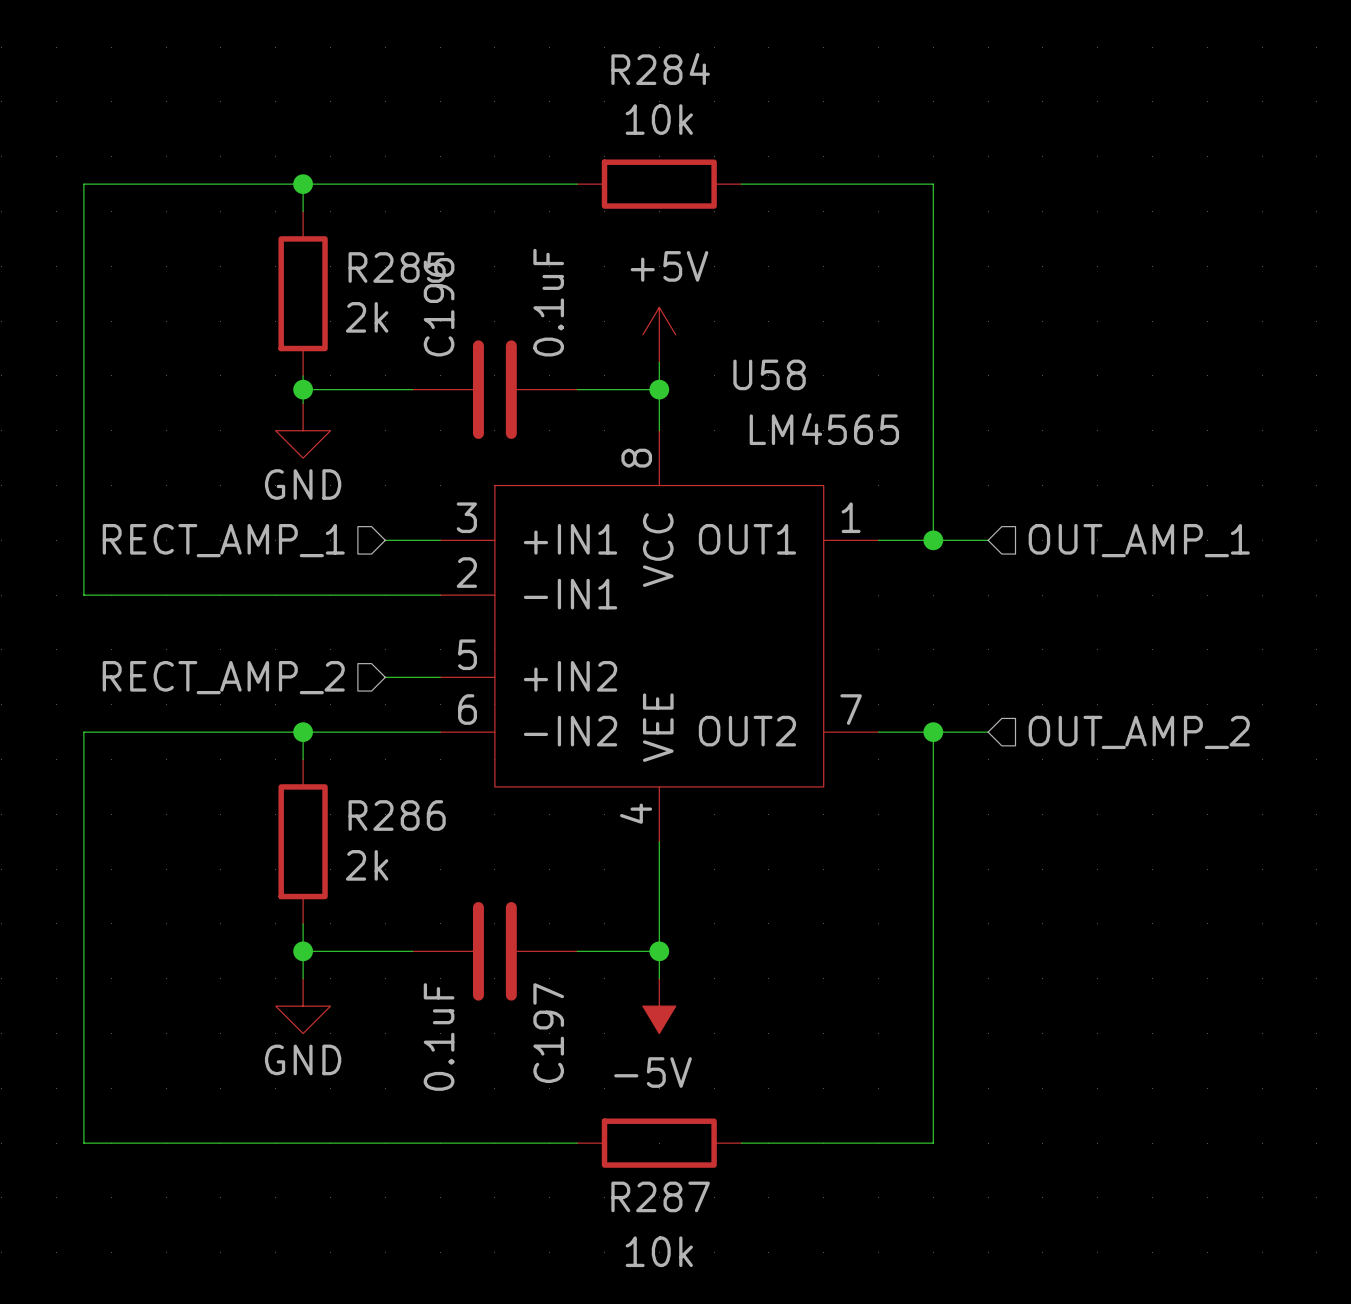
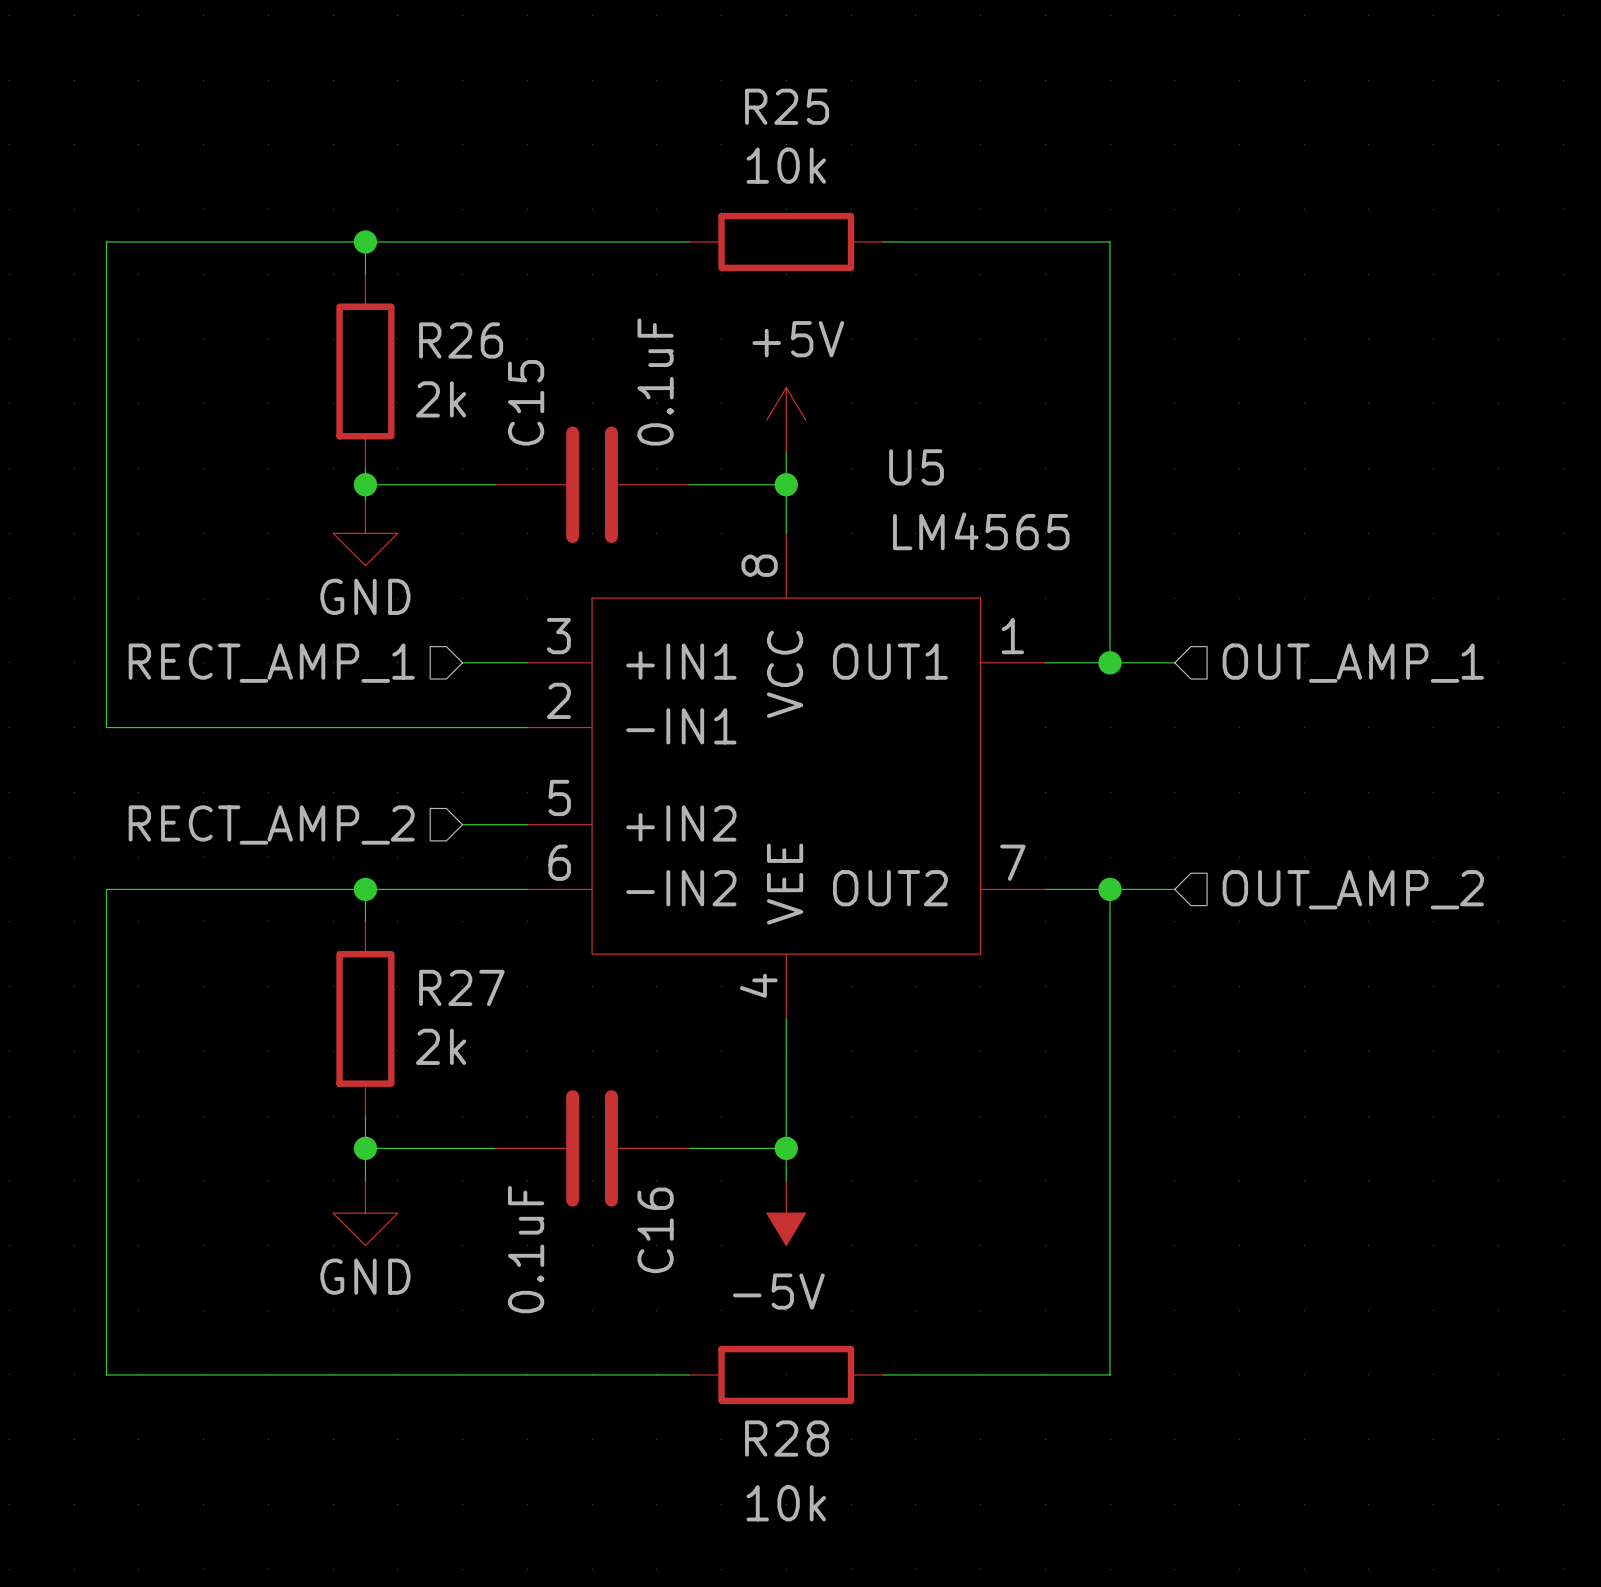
R284 name: R284 (660, 69) -> R25 (787, 106)
R285 name: R285 (397, 267) -> R26 (461, 340)
C196 name: C196 (439, 307) -> C15 (526, 402)
U58 name: U58 (769, 374) -> U5 (916, 467)
R286 name: R286 (397, 815) -> R27 (461, 987)
C197 name: C197 (548, 1033) -> C16 (655, 1230)
R287 name: R287 (660, 1196) -> R28 (787, 1438)

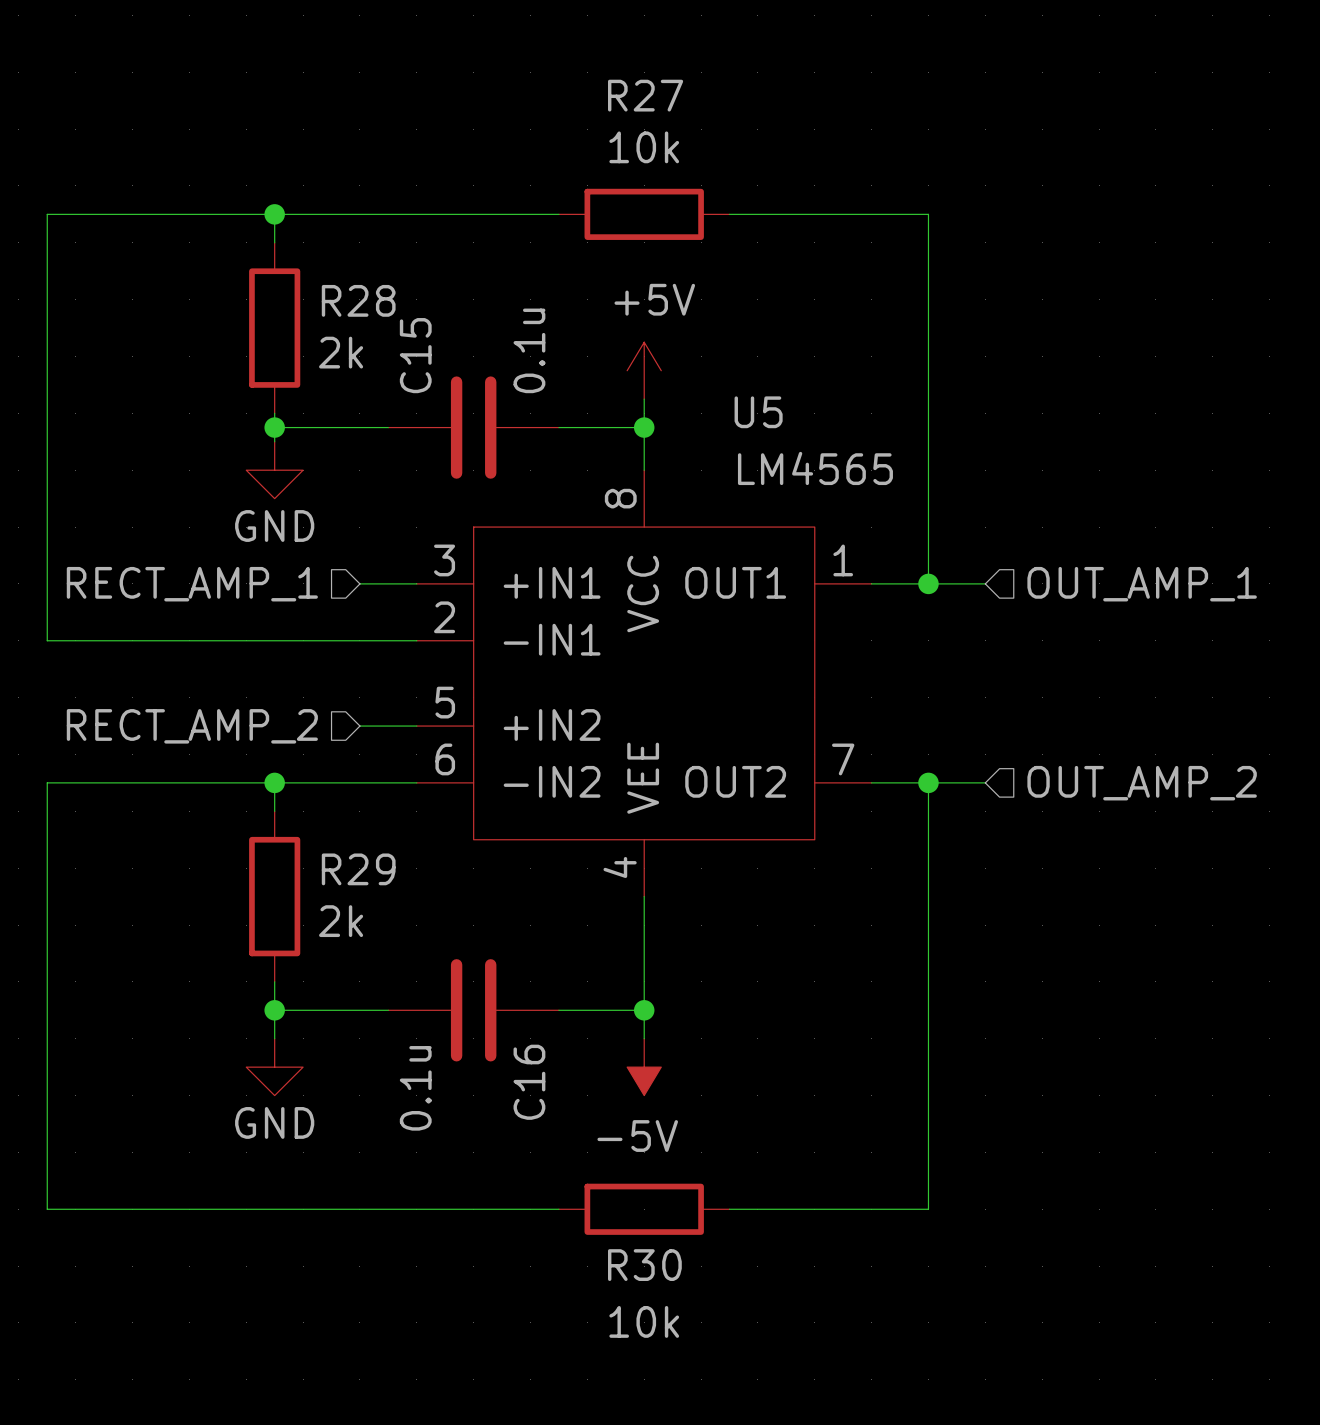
R25 name: R25 (787, 106) -> R27 (645, 95)
R26 name: R26 (461, 340) -> R28 (358, 300)
C15 value: 0.1uF (655, 382) -> 0.1u (529, 350)
R27 name: R27 (461, 987) -> R29 (358, 869)
C16 value: 0.1uF (526, 1249) -> 0.1u (415, 1088)
R28 name: R28 (787, 1438) -> R30 (644, 1265)

